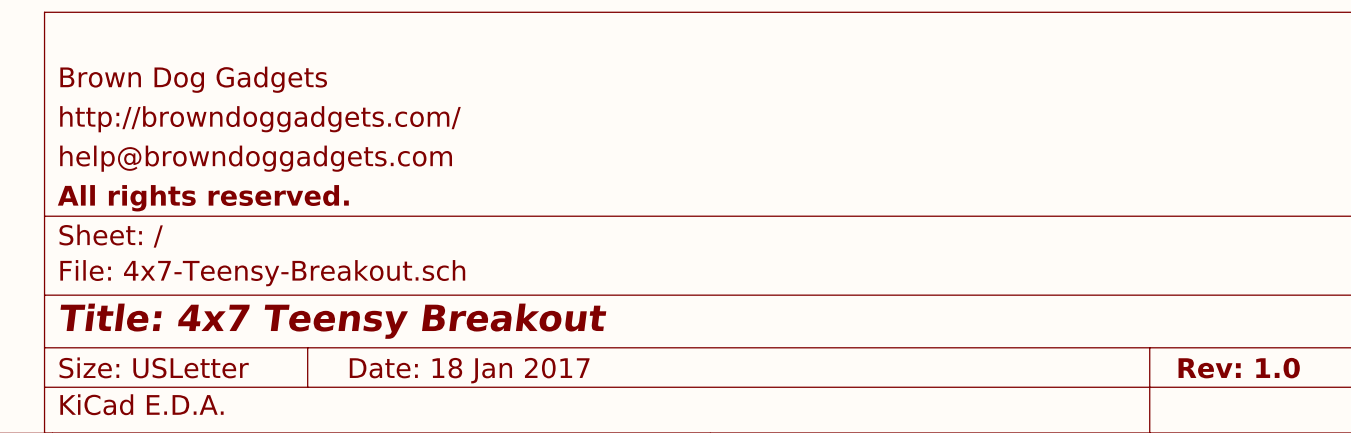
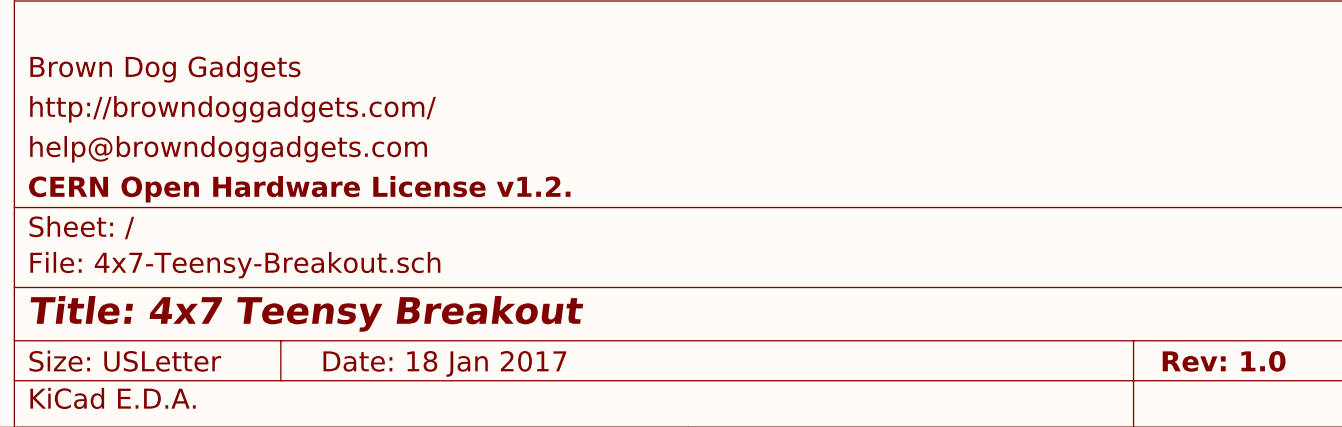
title block: All rights reserved. (203, 198) -> CERN Open Hardware License v1.2. (299, 189)

